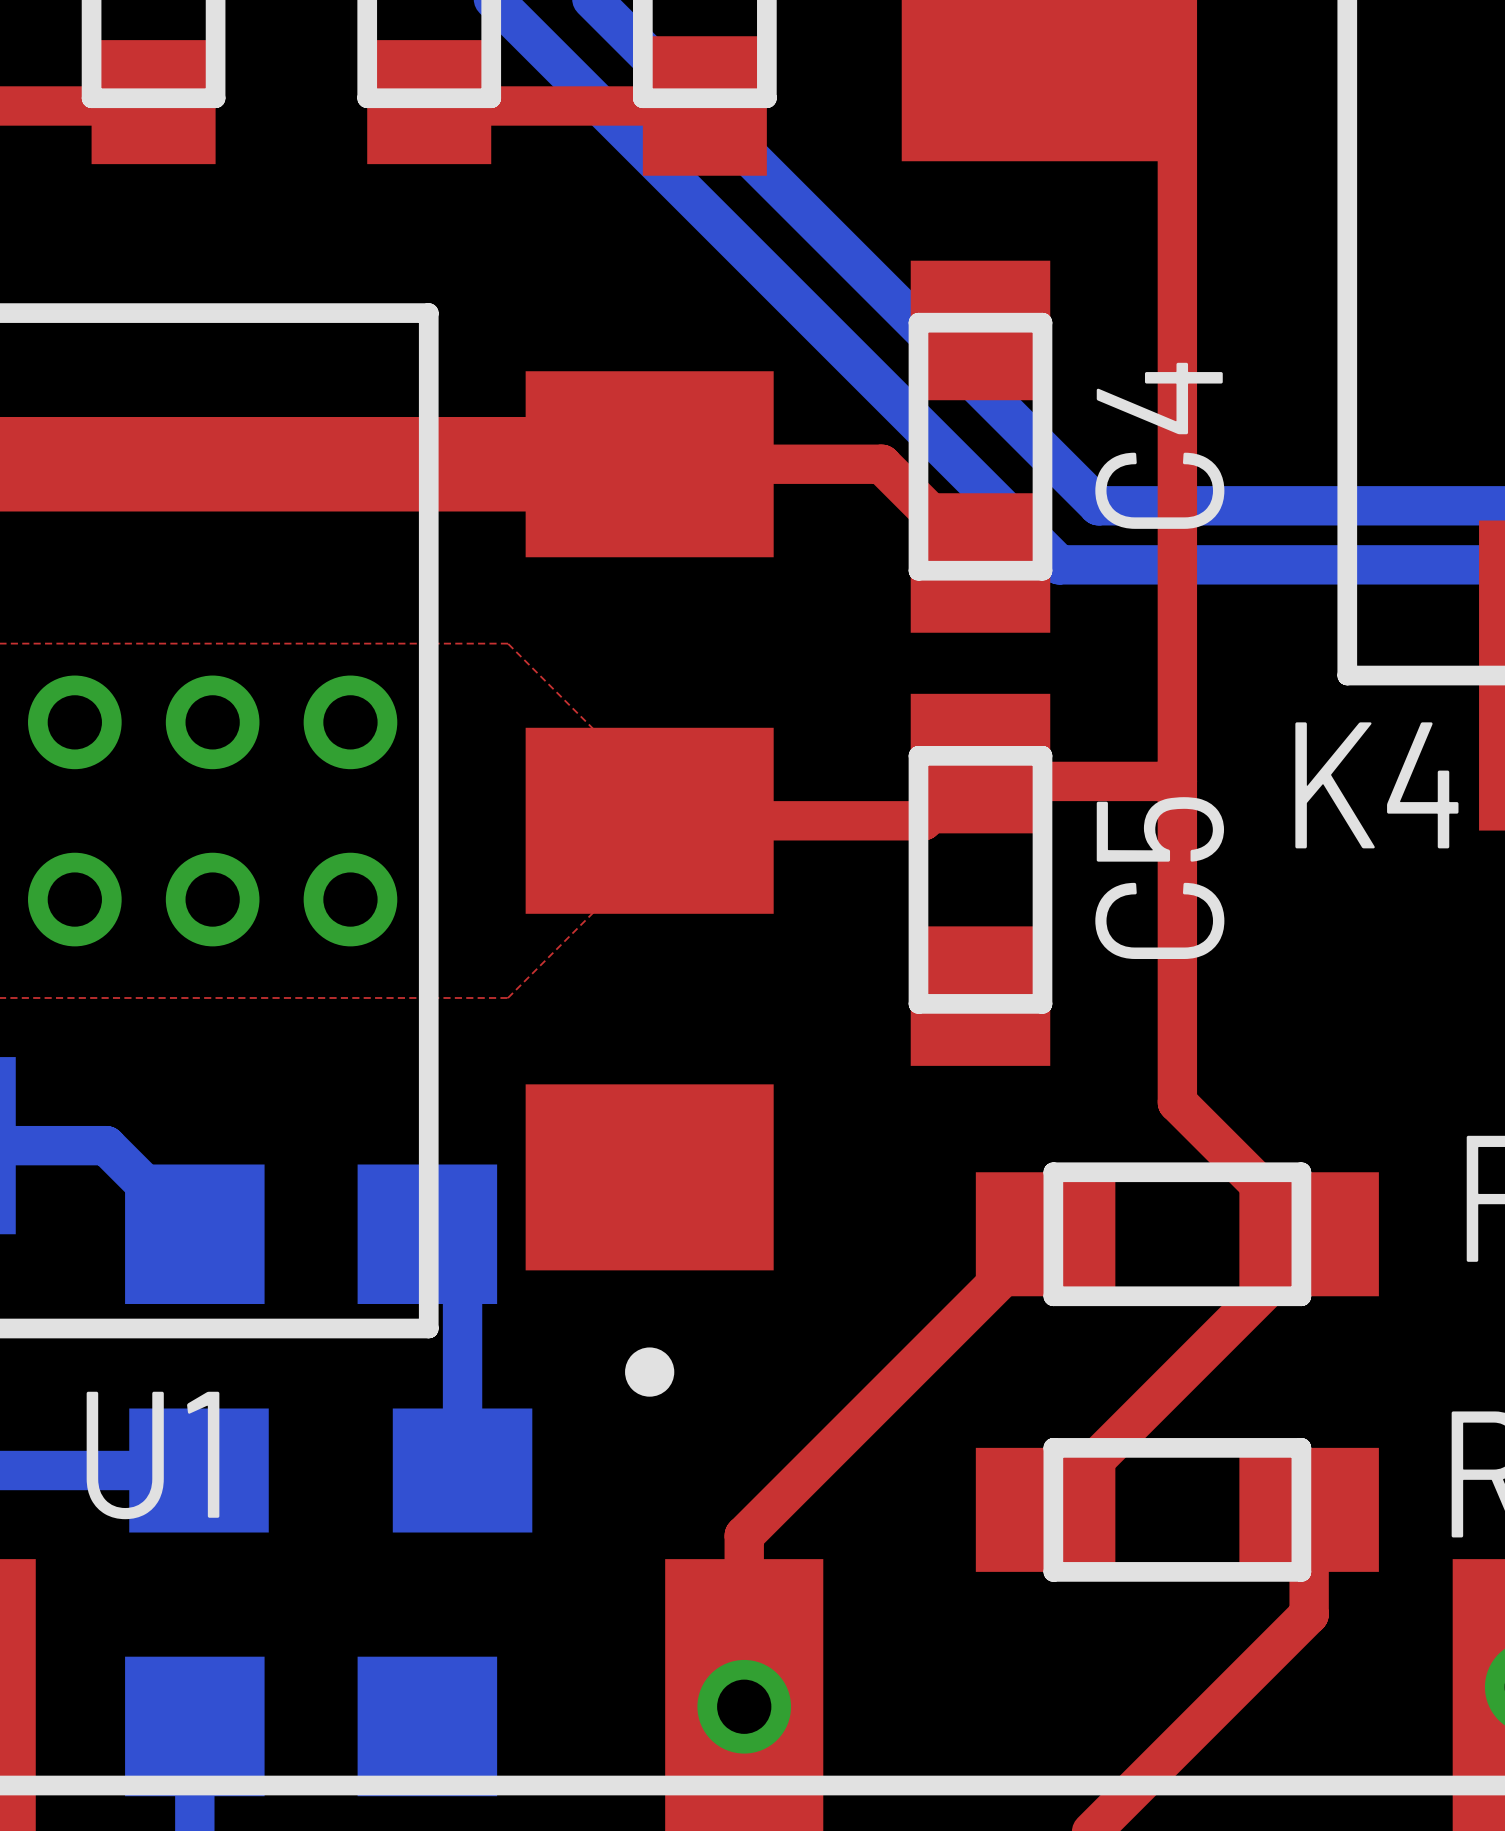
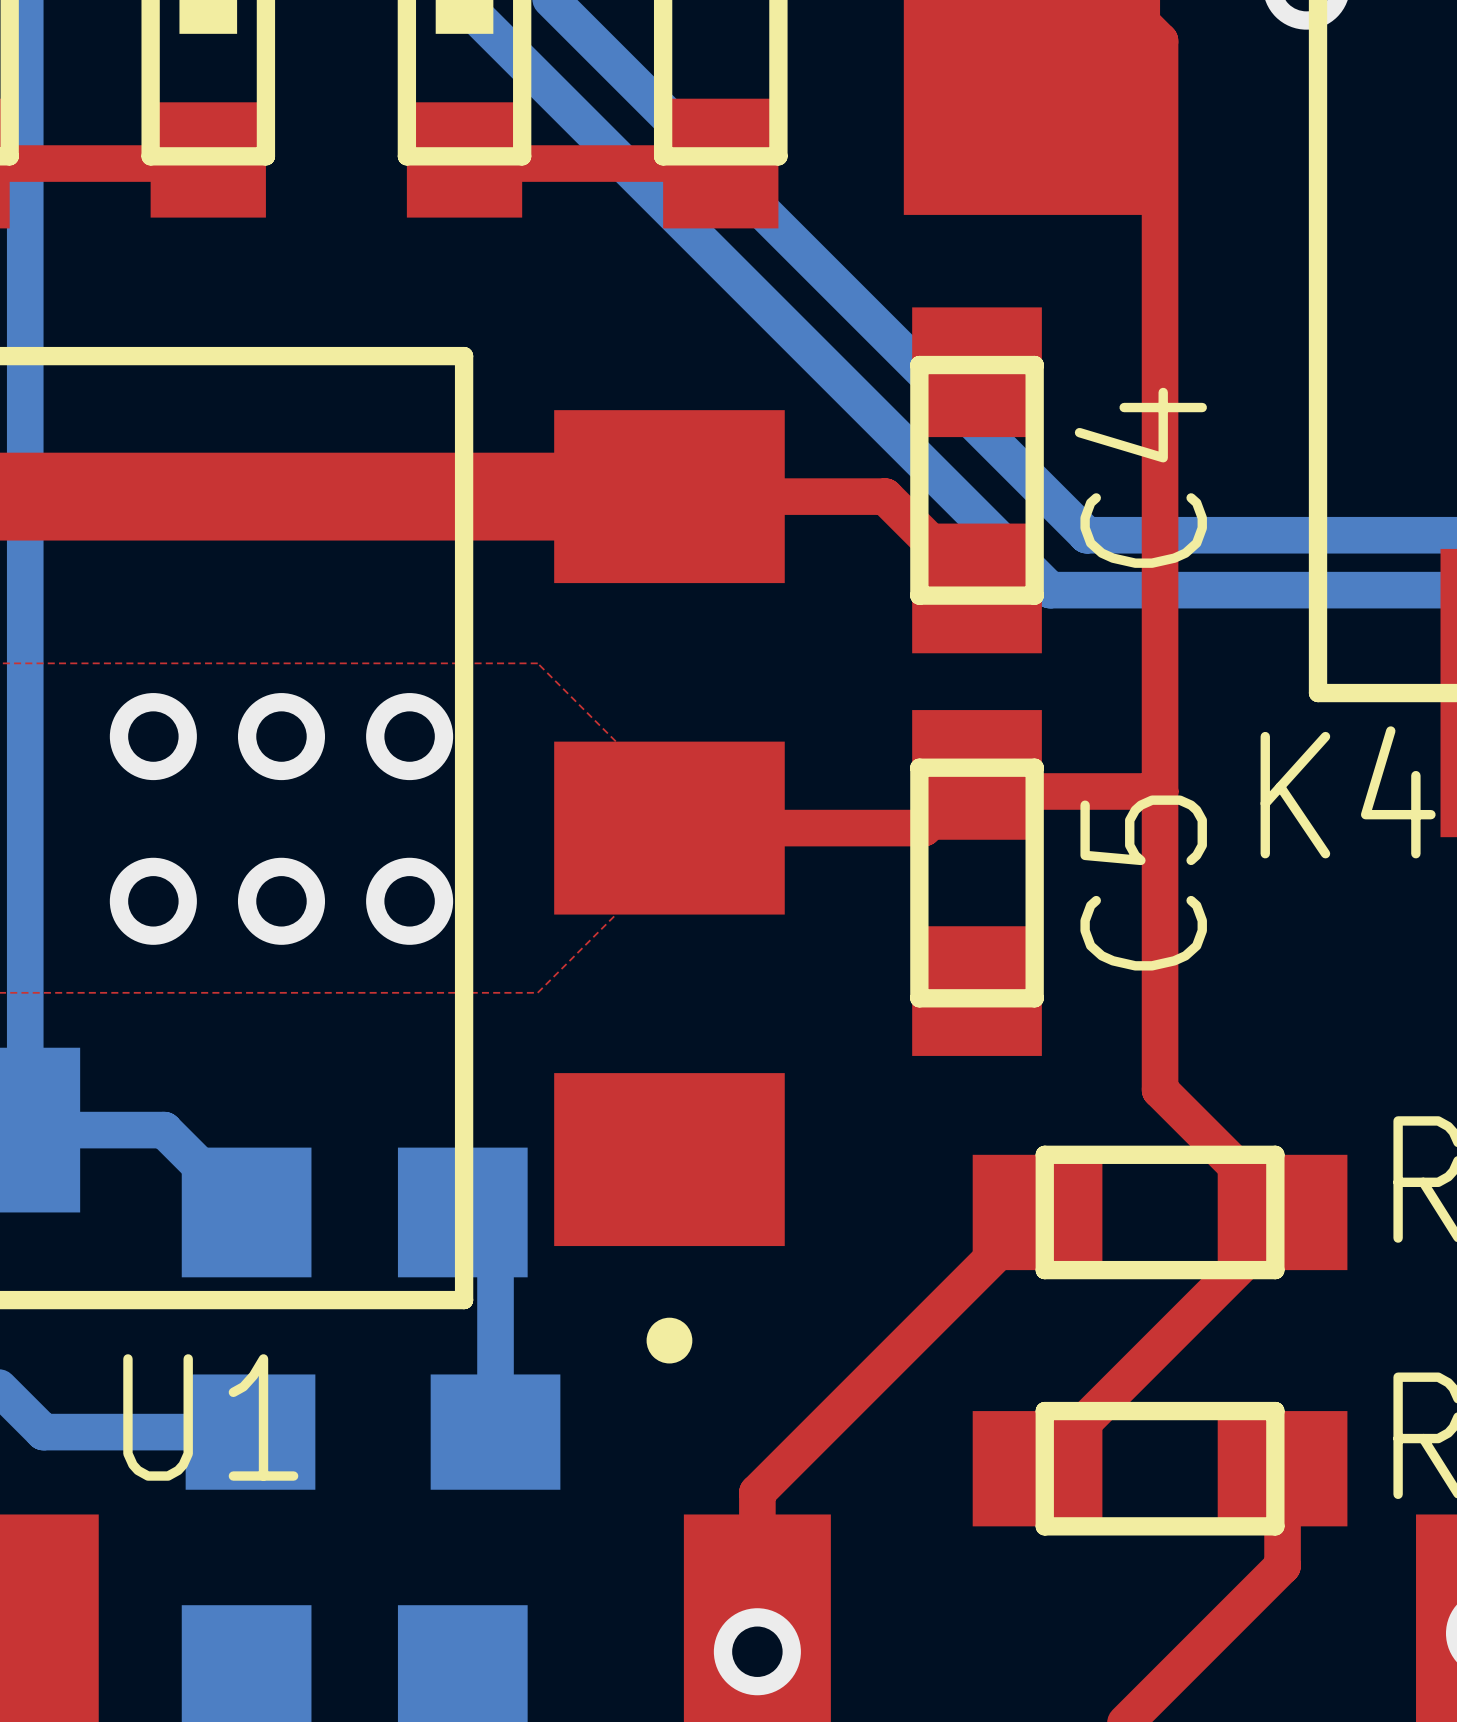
via position: (74, 722) -> (153, 736)
via position: (212, 722) -> (281, 736)
via position: (350, 722) -> (409, 736)
via position: (74, 899) -> (153, 901)
via position: (212, 899) -> (281, 901)
via position: (350, 899) -> (409, 901)

